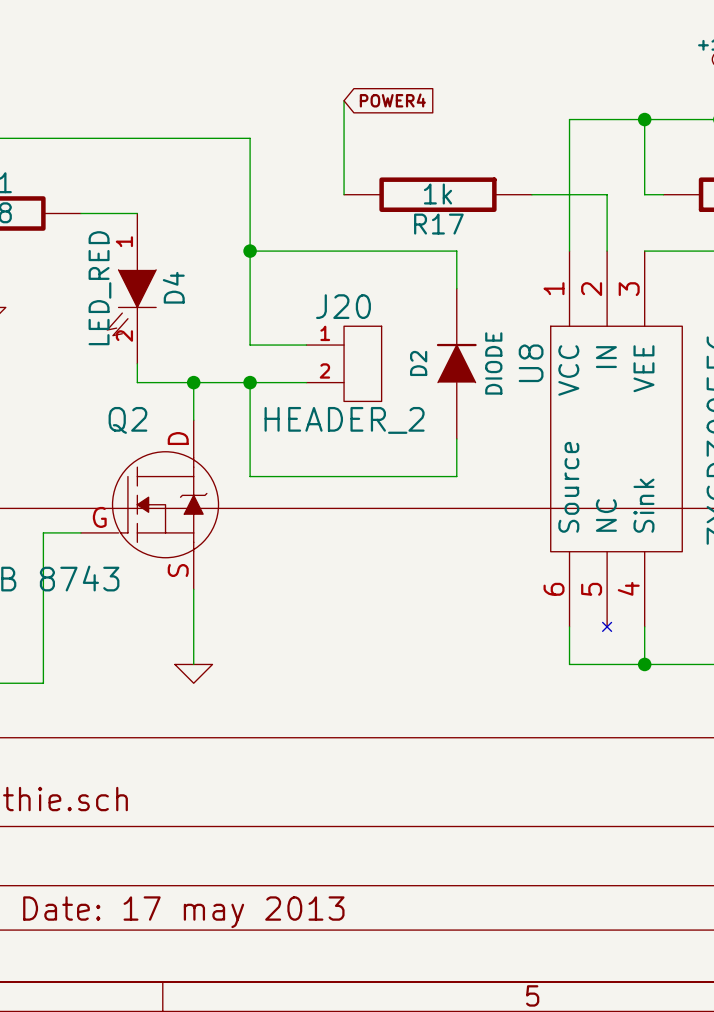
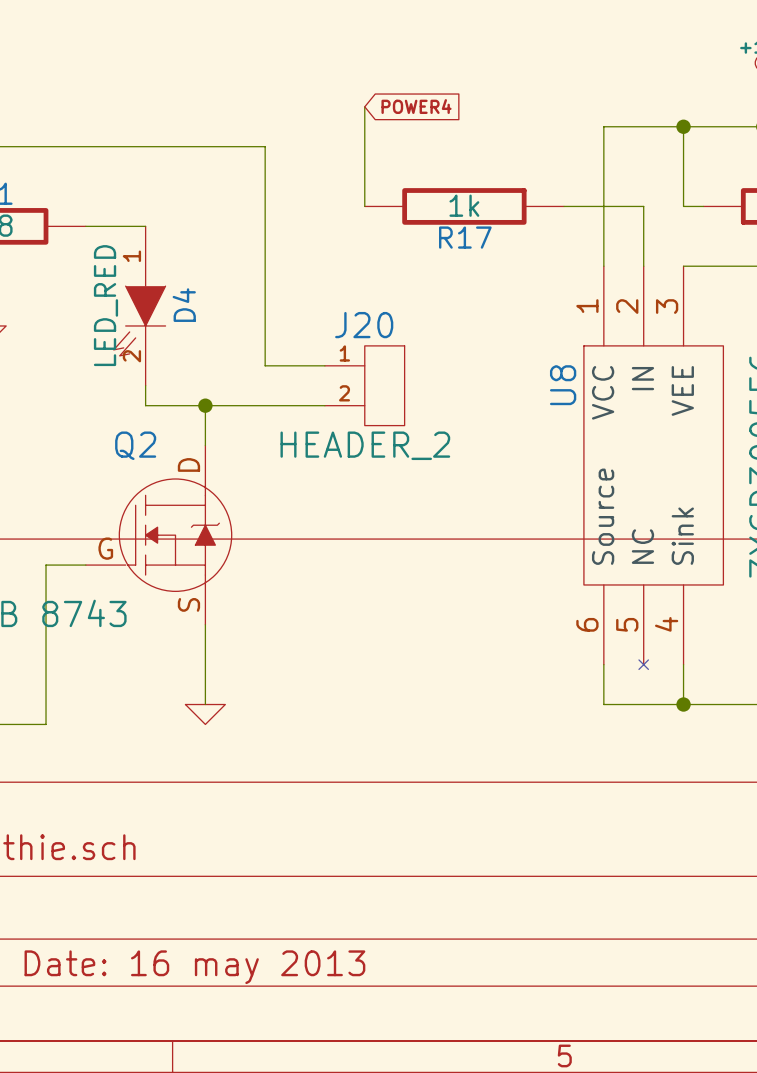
wire: (250, 251) (456, 251) (456, 288) -> none
junction: (250, 251) -> none
D2: DIODE (456, 363) -> none
wire: (250, 382) (250, 476) (456, 476) (456, 438) -> none
junction: (250, 382) -> none
title block: Date: 17 may 2013 (183, 912) -> Date: 16 may 2013 (194, 967)

